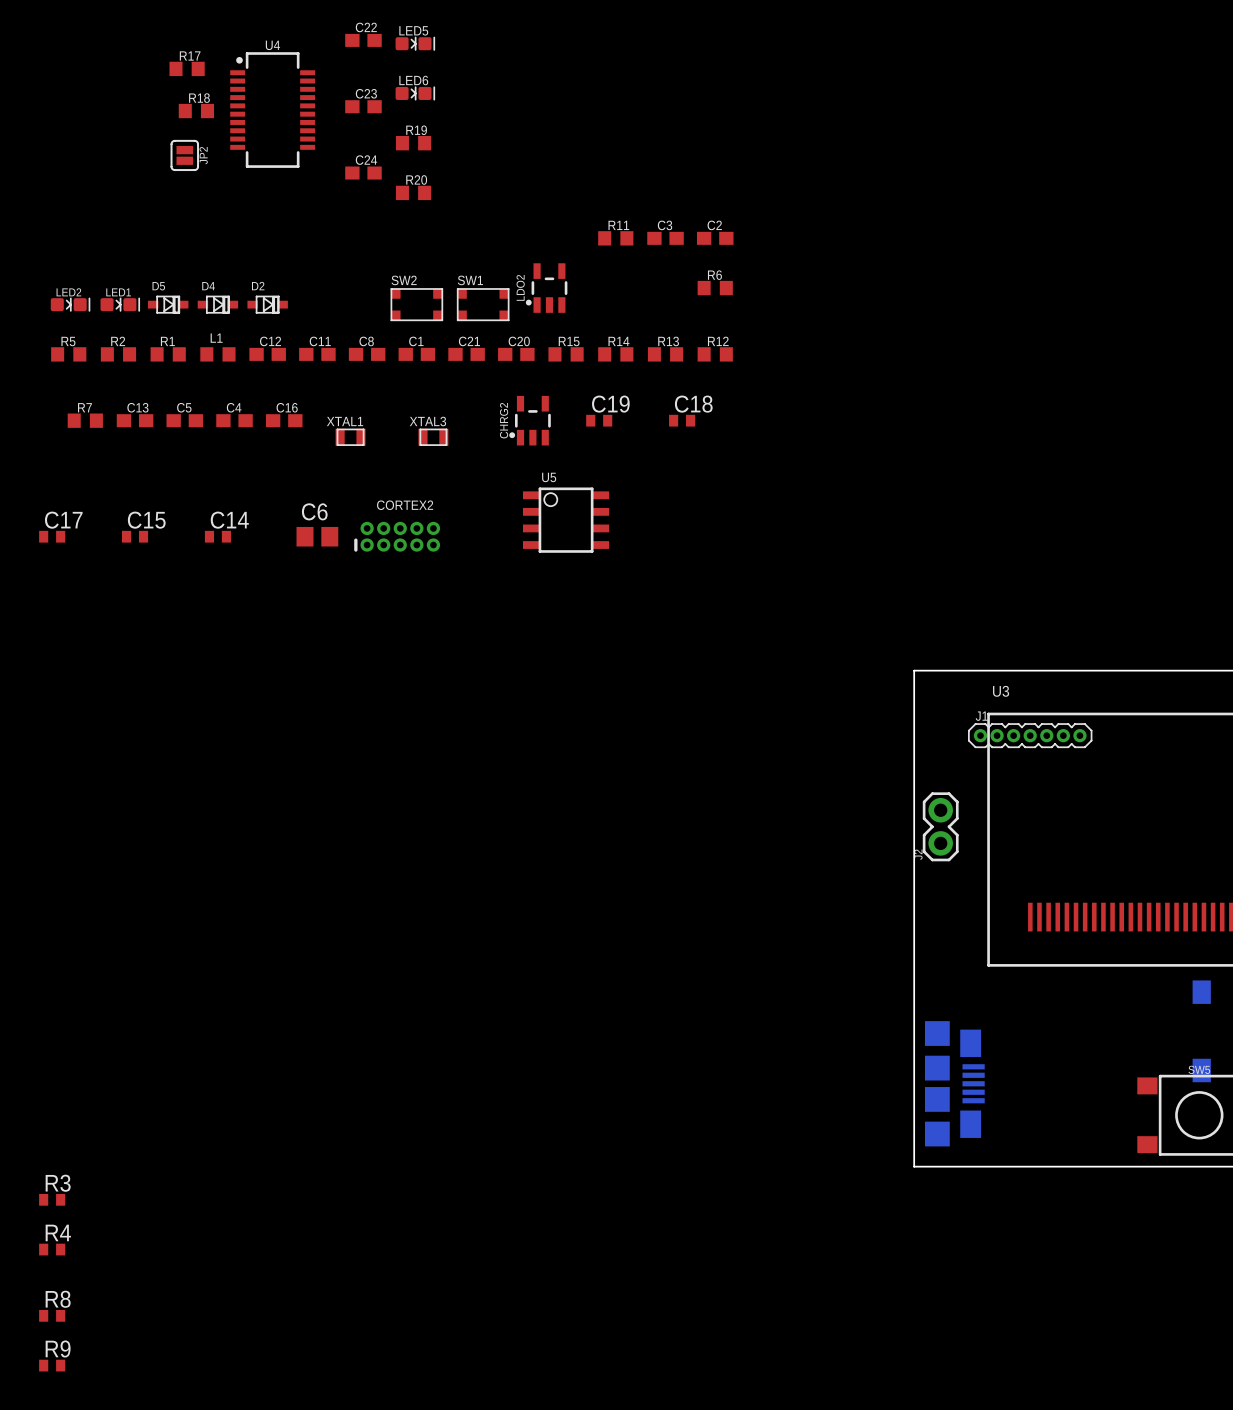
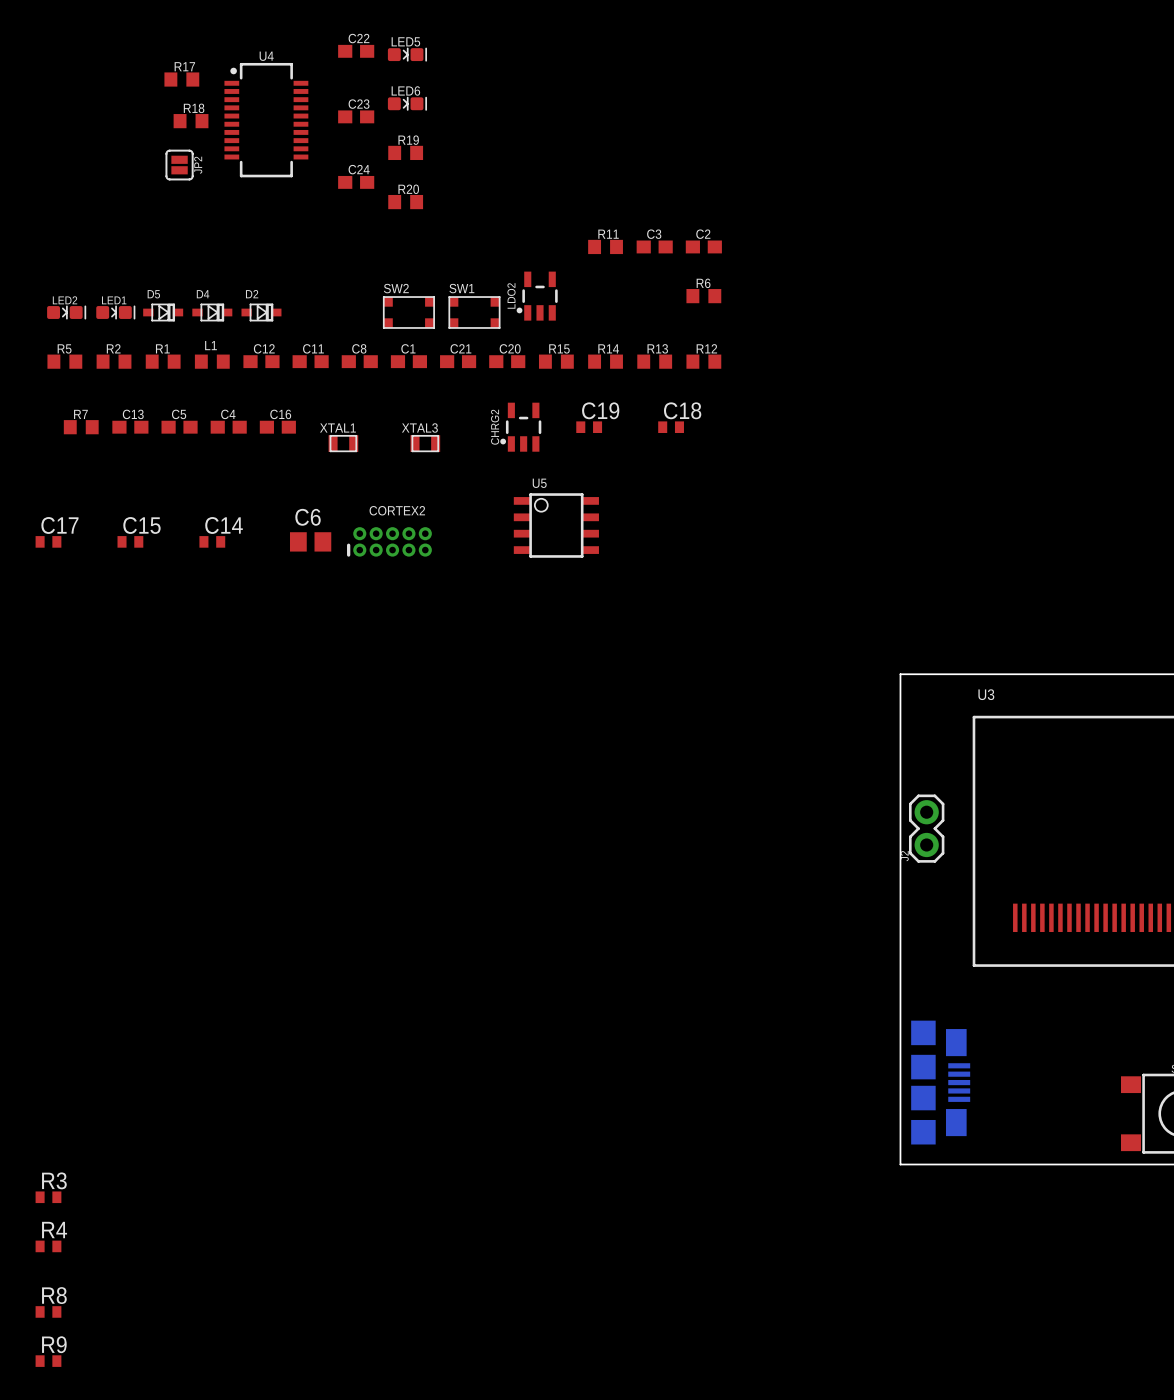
J1: (1030, 735) -> none

